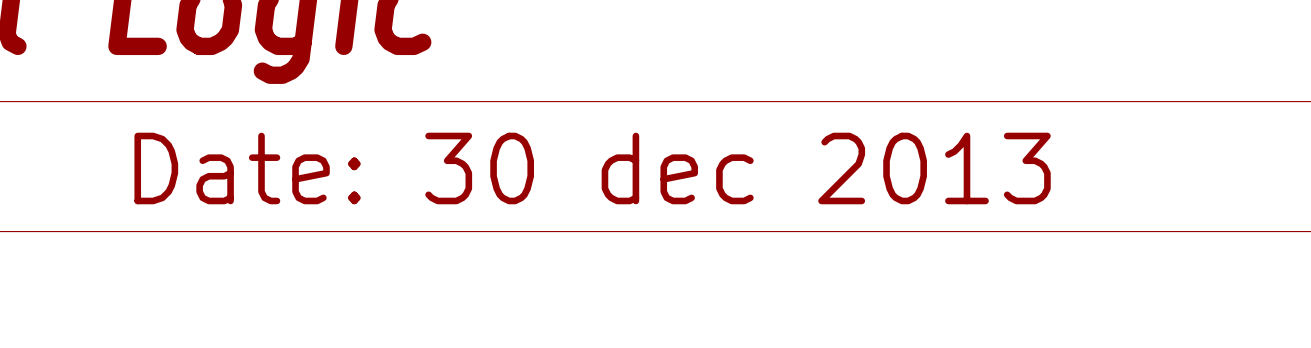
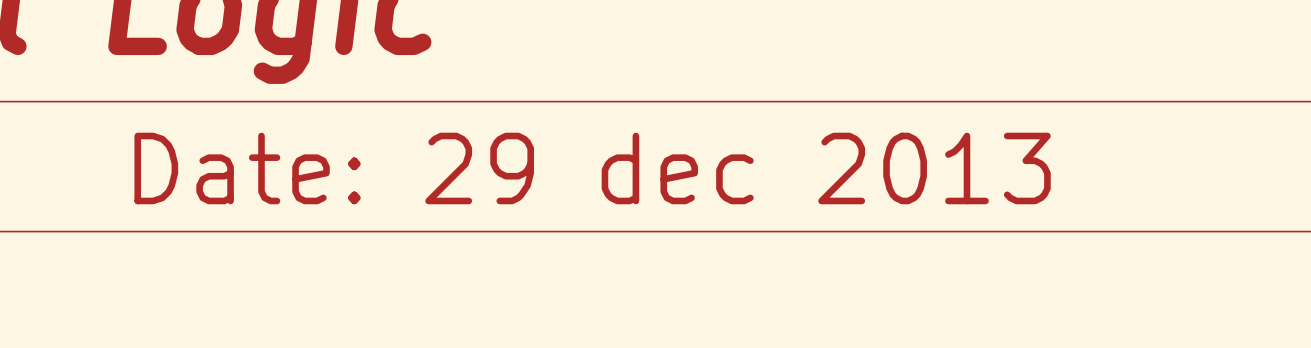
title block: Date: 30 dec 2013 (592, 168) -> Date: 29 dec 2013 (592, 168)

